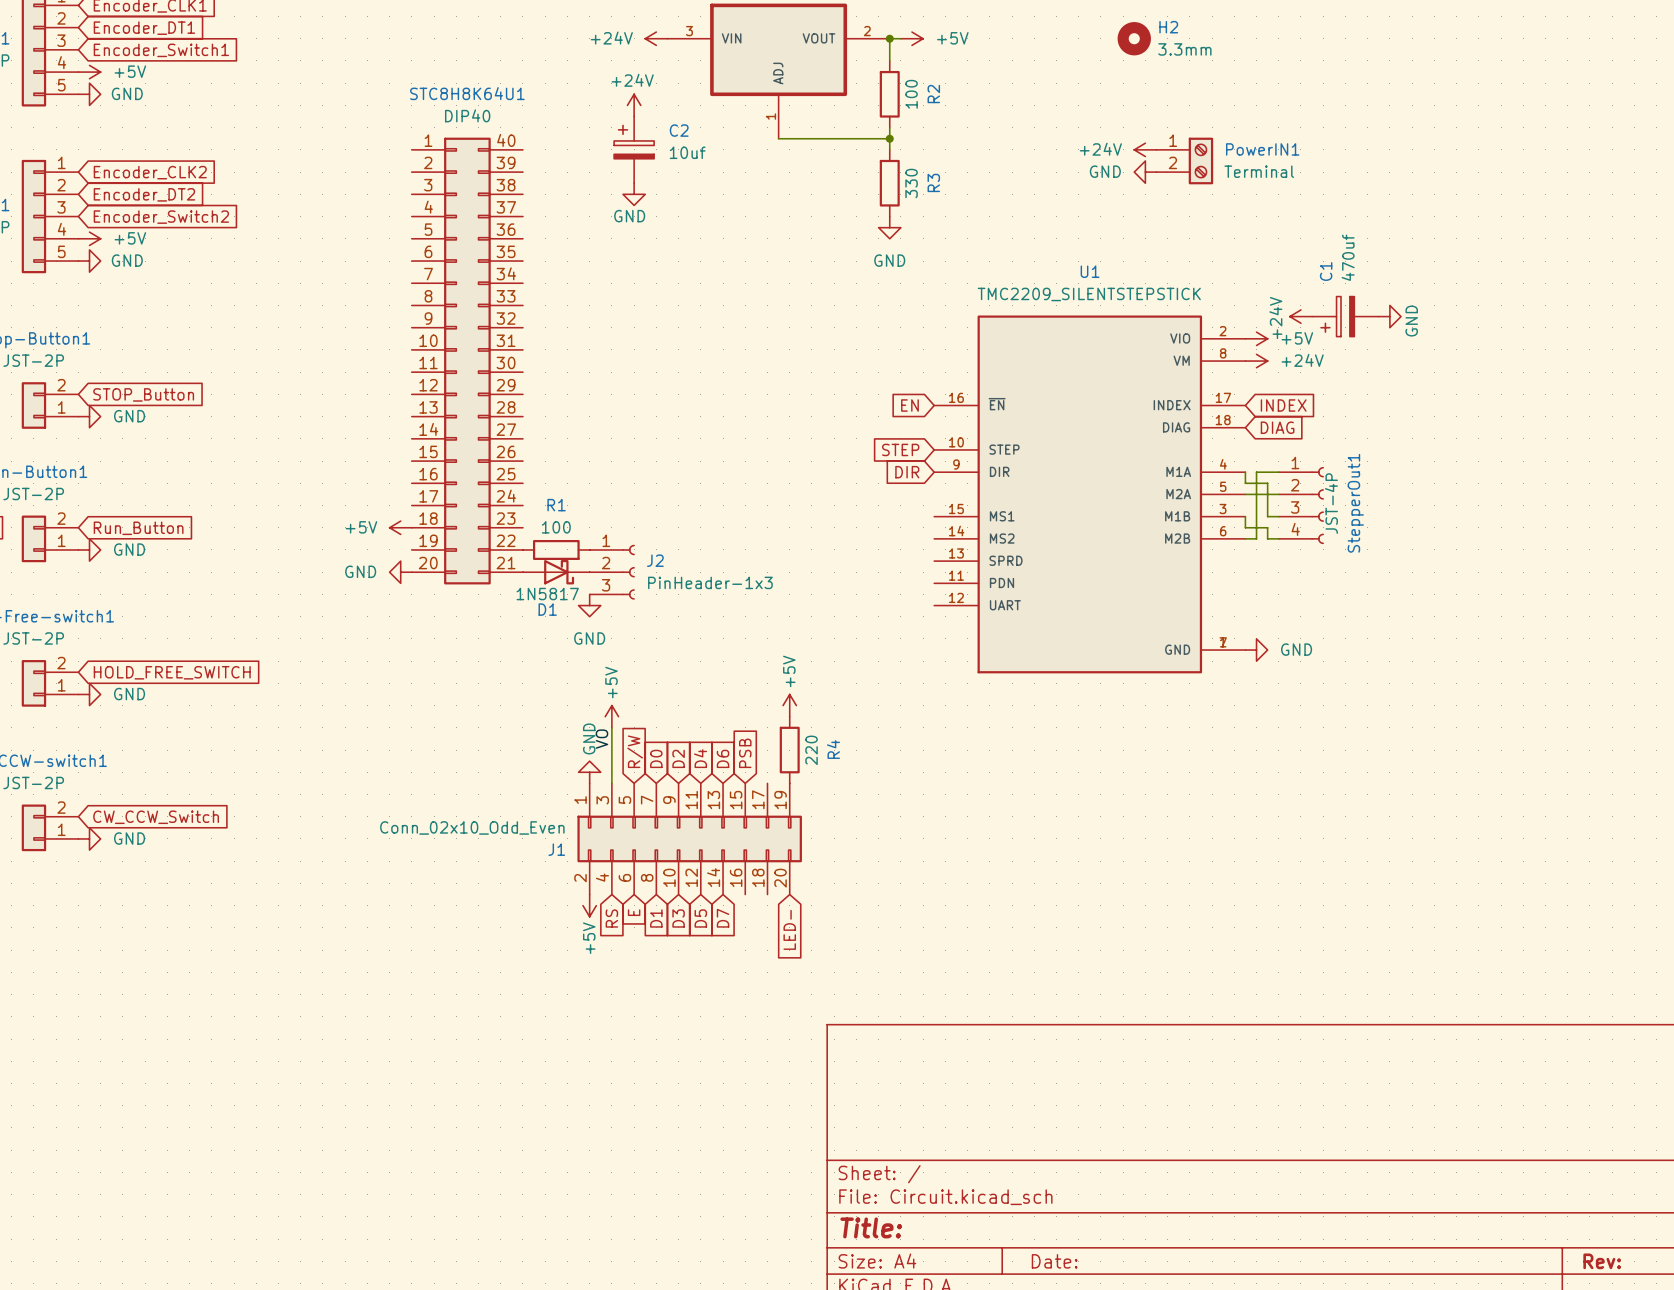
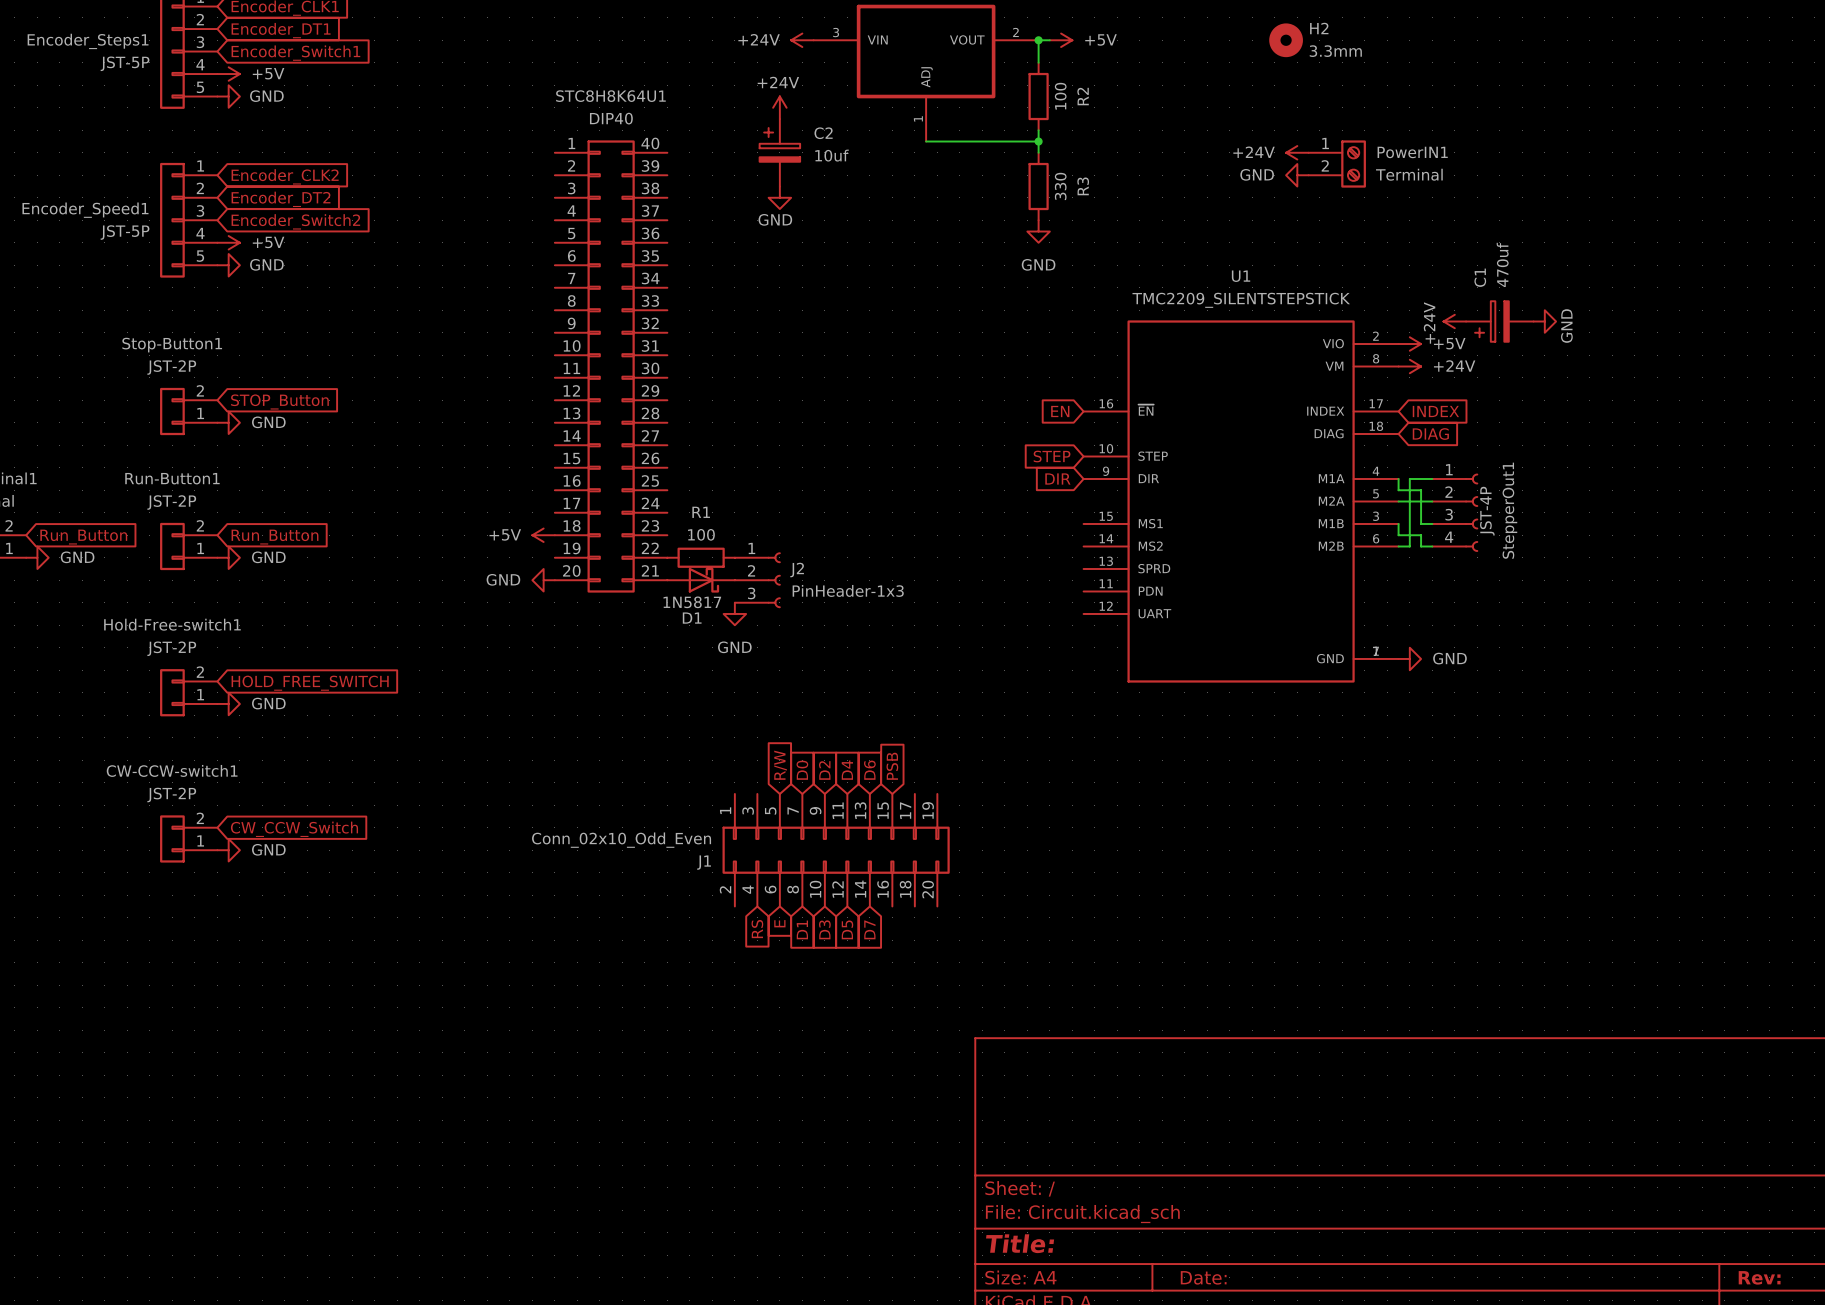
power symbol: +5V (789, 705) -> none
power symbol: +5V (611, 716) -> none
wire: (611, 727) (611, 783) -> none
label: VO (601, 739) -> none
R4: 220 (789, 750) -> none
power symbol: GND (589, 772) -> none
power symbol: +5V (589, 905) -> none
global label: LED- (789, 929) -> none

